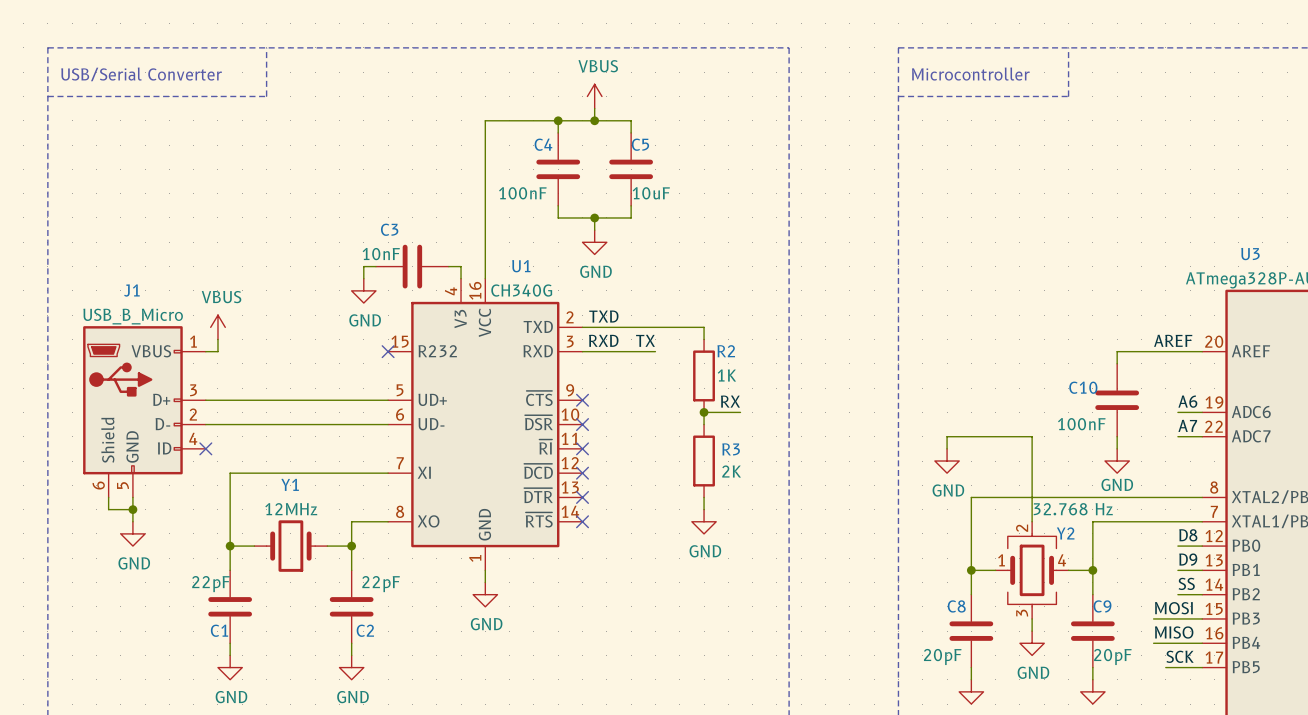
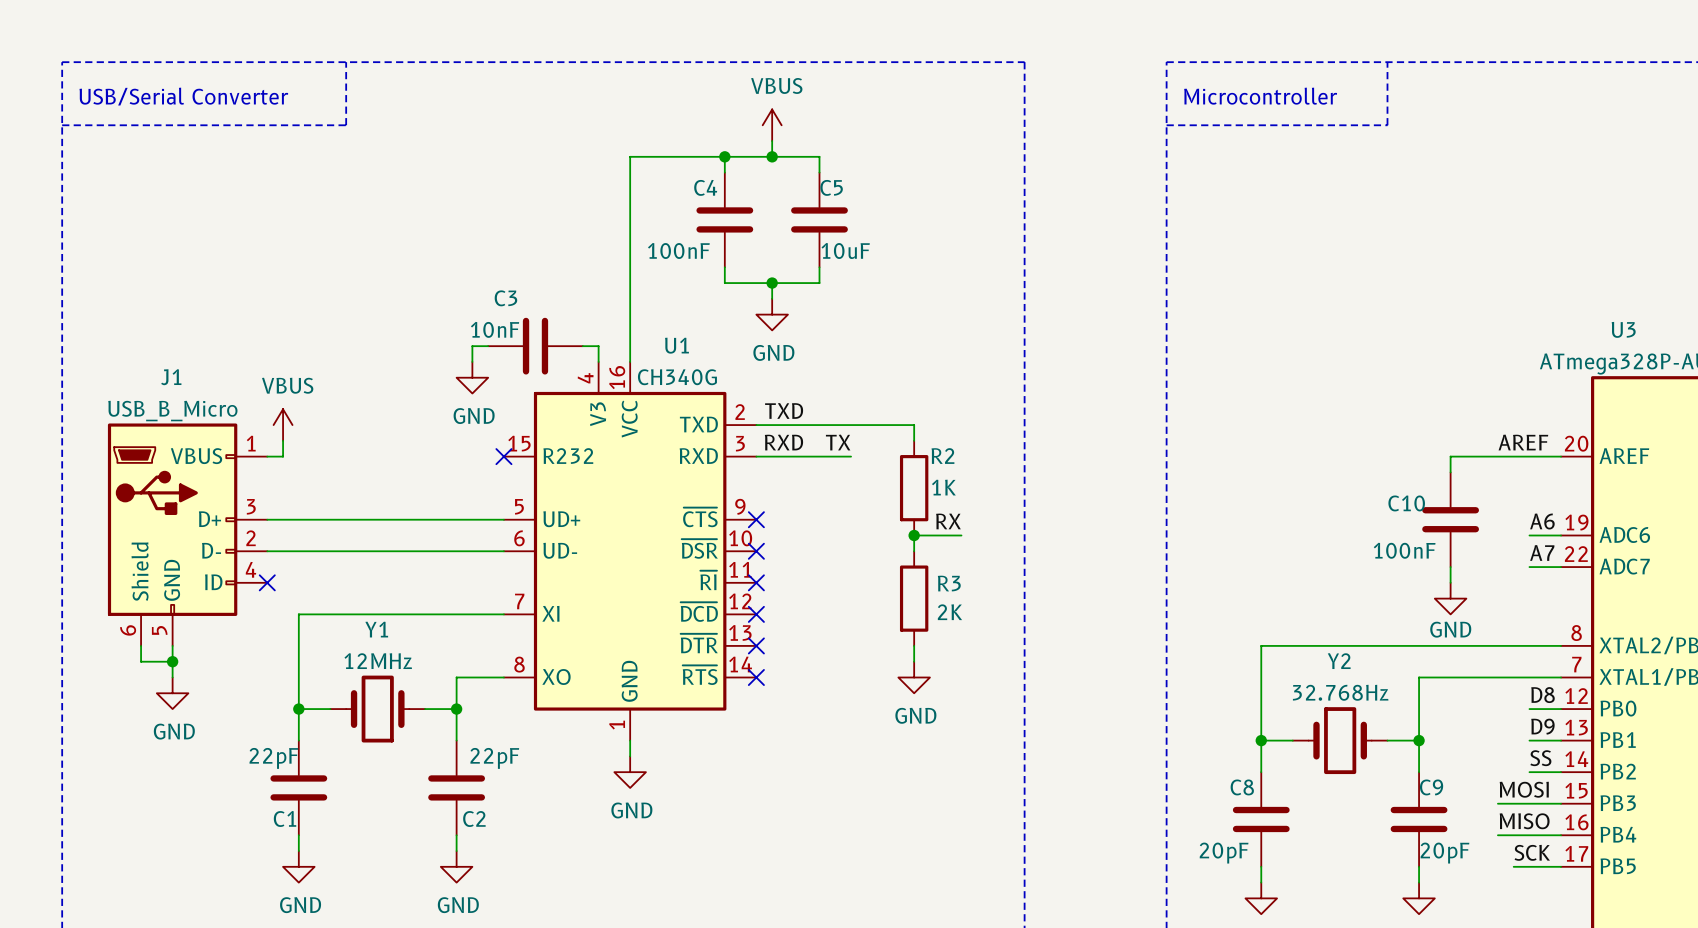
wire: (947, 448) (947, 436) (1032, 436) (1032, 521) -> none
power symbol: GND (947, 461) -> none
Y2 value: 32.768 Hz (1073, 509) -> 32.768Hz (1340, 692)
Y2 symbol: [995, 521, 1069, 619] -> [1292, 707, 1388, 775]
Y2 name position: Y2 (1065, 533) -> Y2 (1339, 661)
wire: (1032, 618) (1032, 631) -> none
power symbol: GND (1032, 643) -> none

